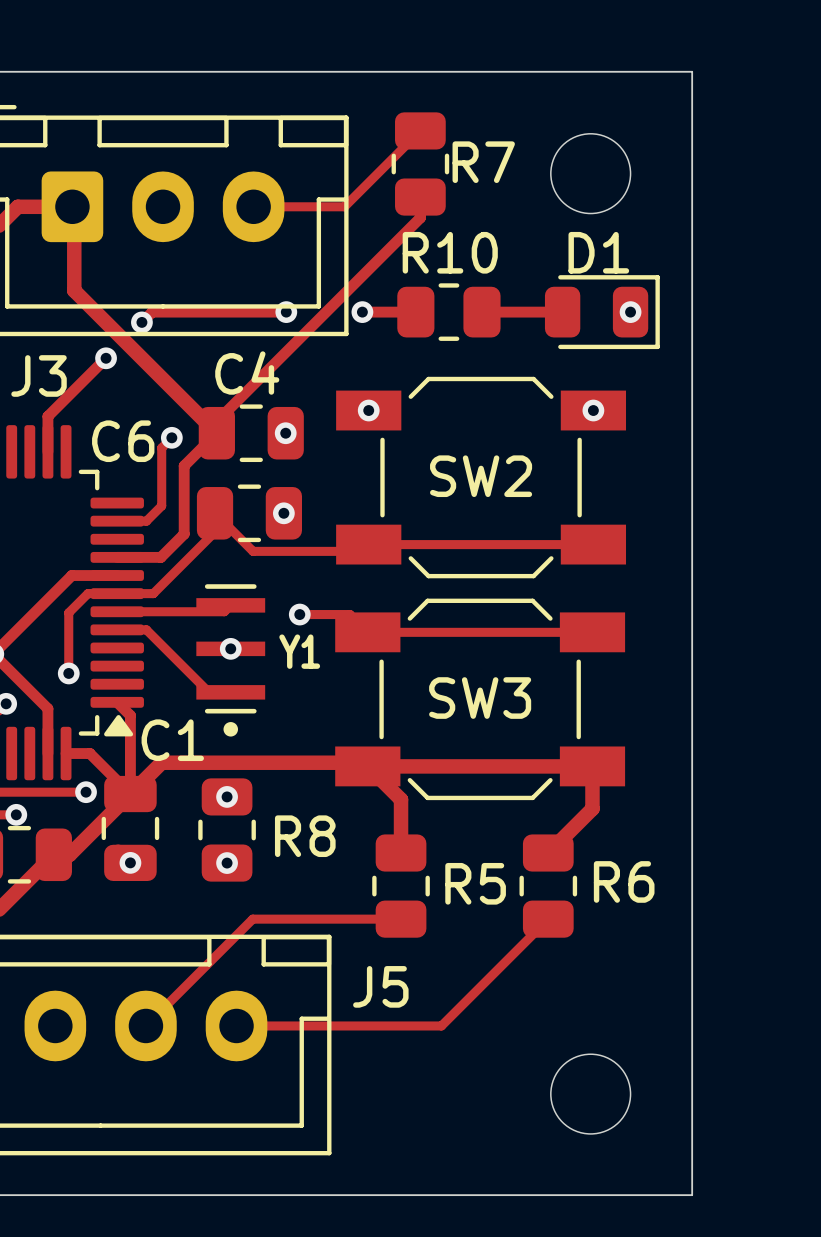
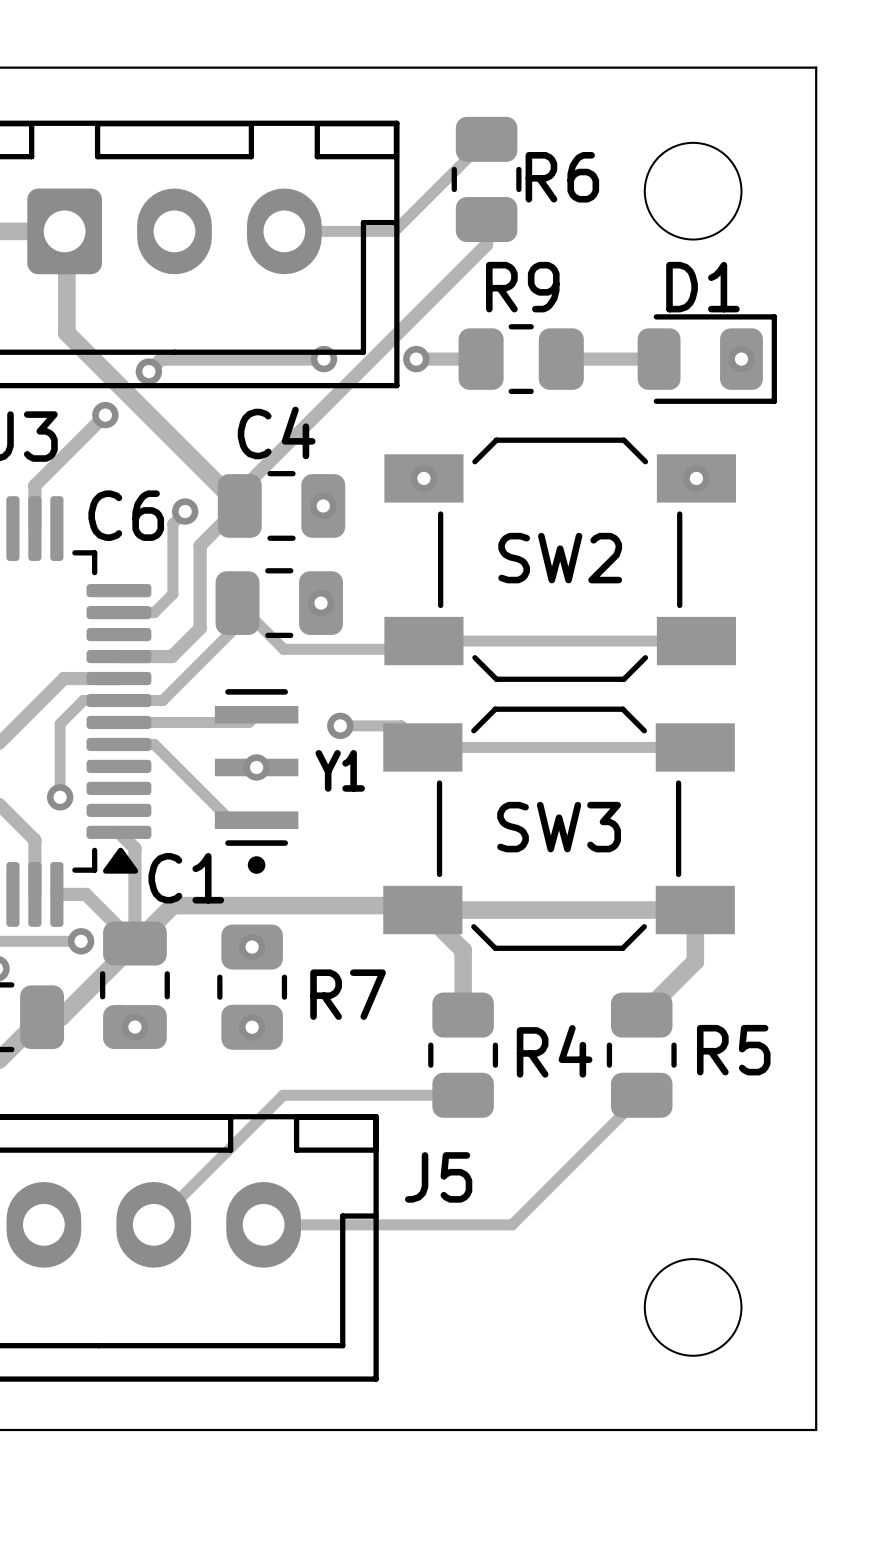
R7 name: R7 (483, 162) -> R6 (562, 177)
R10 name: R10 (450, 252) -> R9 (522, 287)
R8 name: R8 (305, 836) -> R7 (348, 994)
R6 name: R6 (624, 881) -> R5 (733, 1050)
R5 name: R5 (475, 883) -> R4 (554, 1051)

